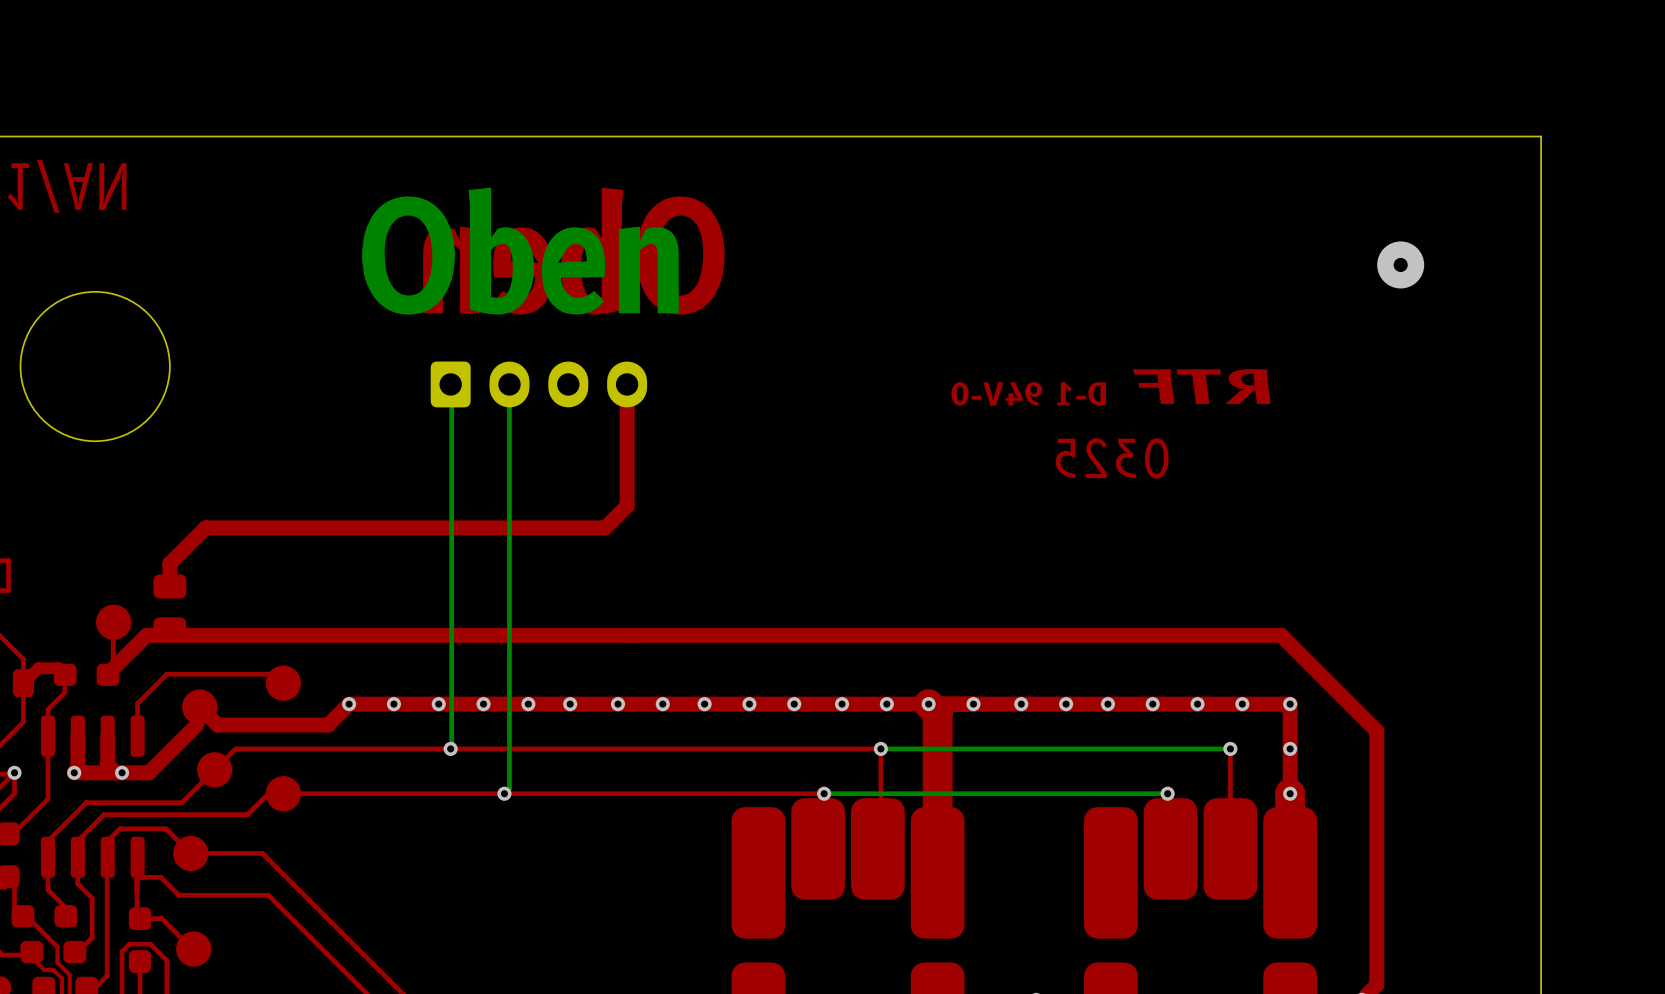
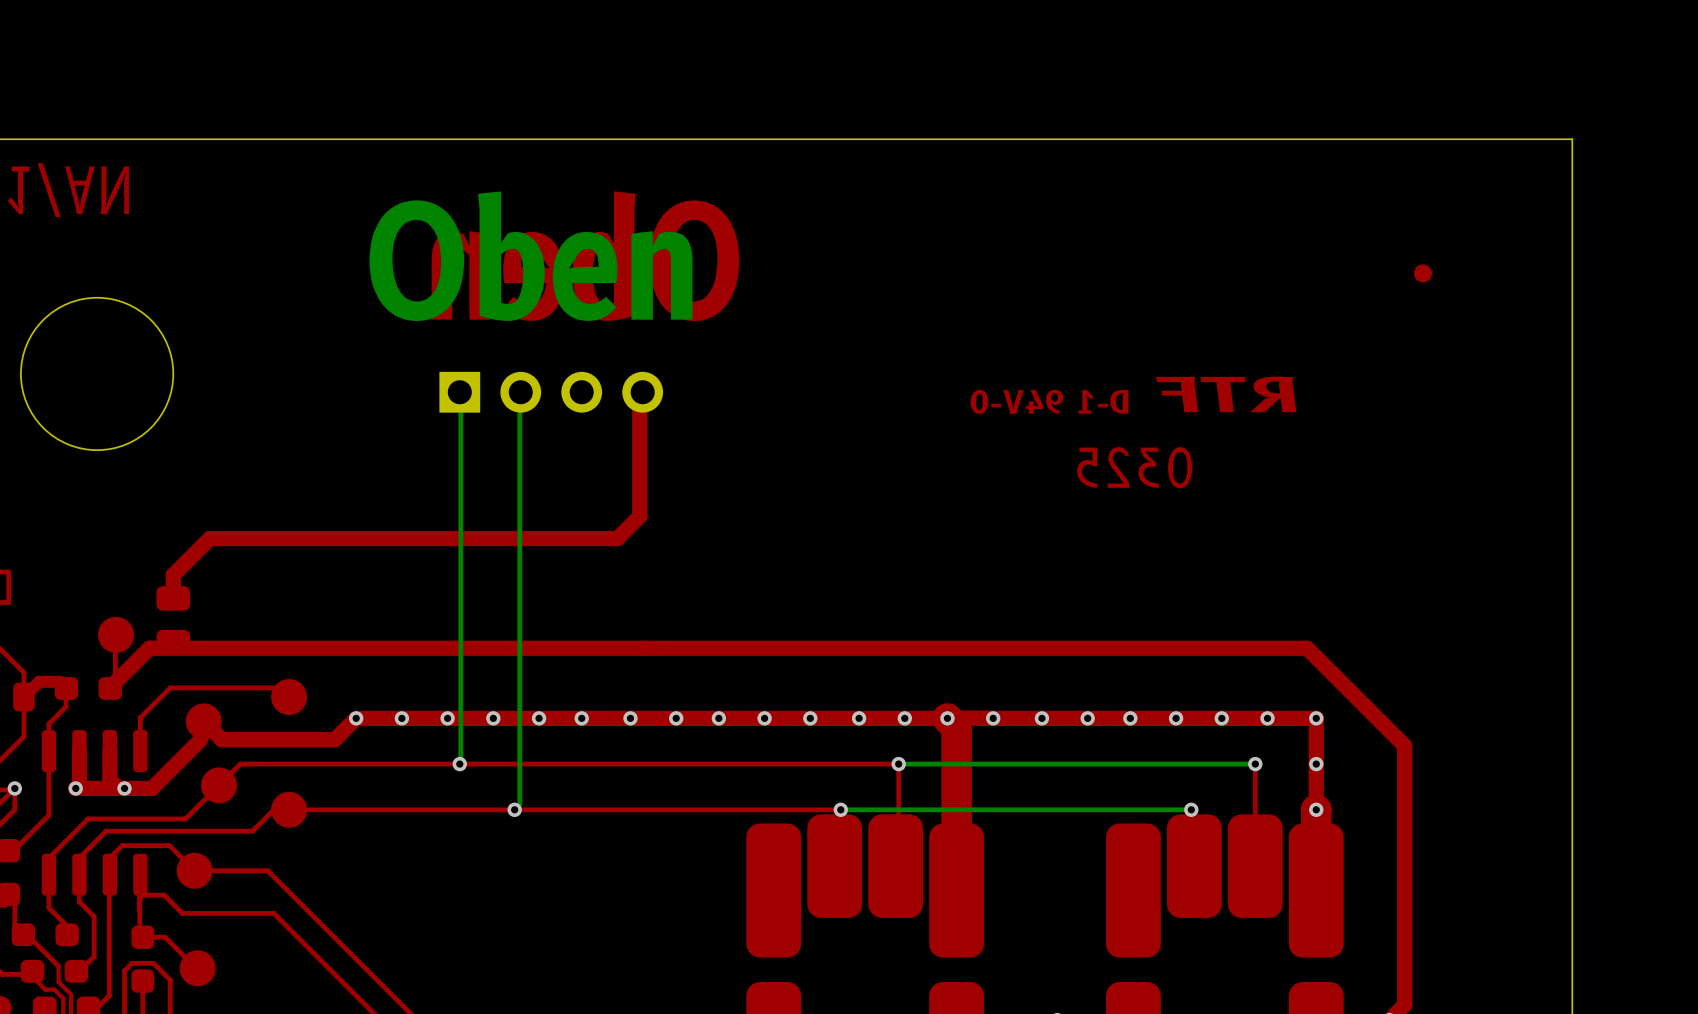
via: (1400, 264) -> none
part: none -> (1422, 273)
part footprint: [430, 361, 648, 408] -> [439, 371, 664, 413]

